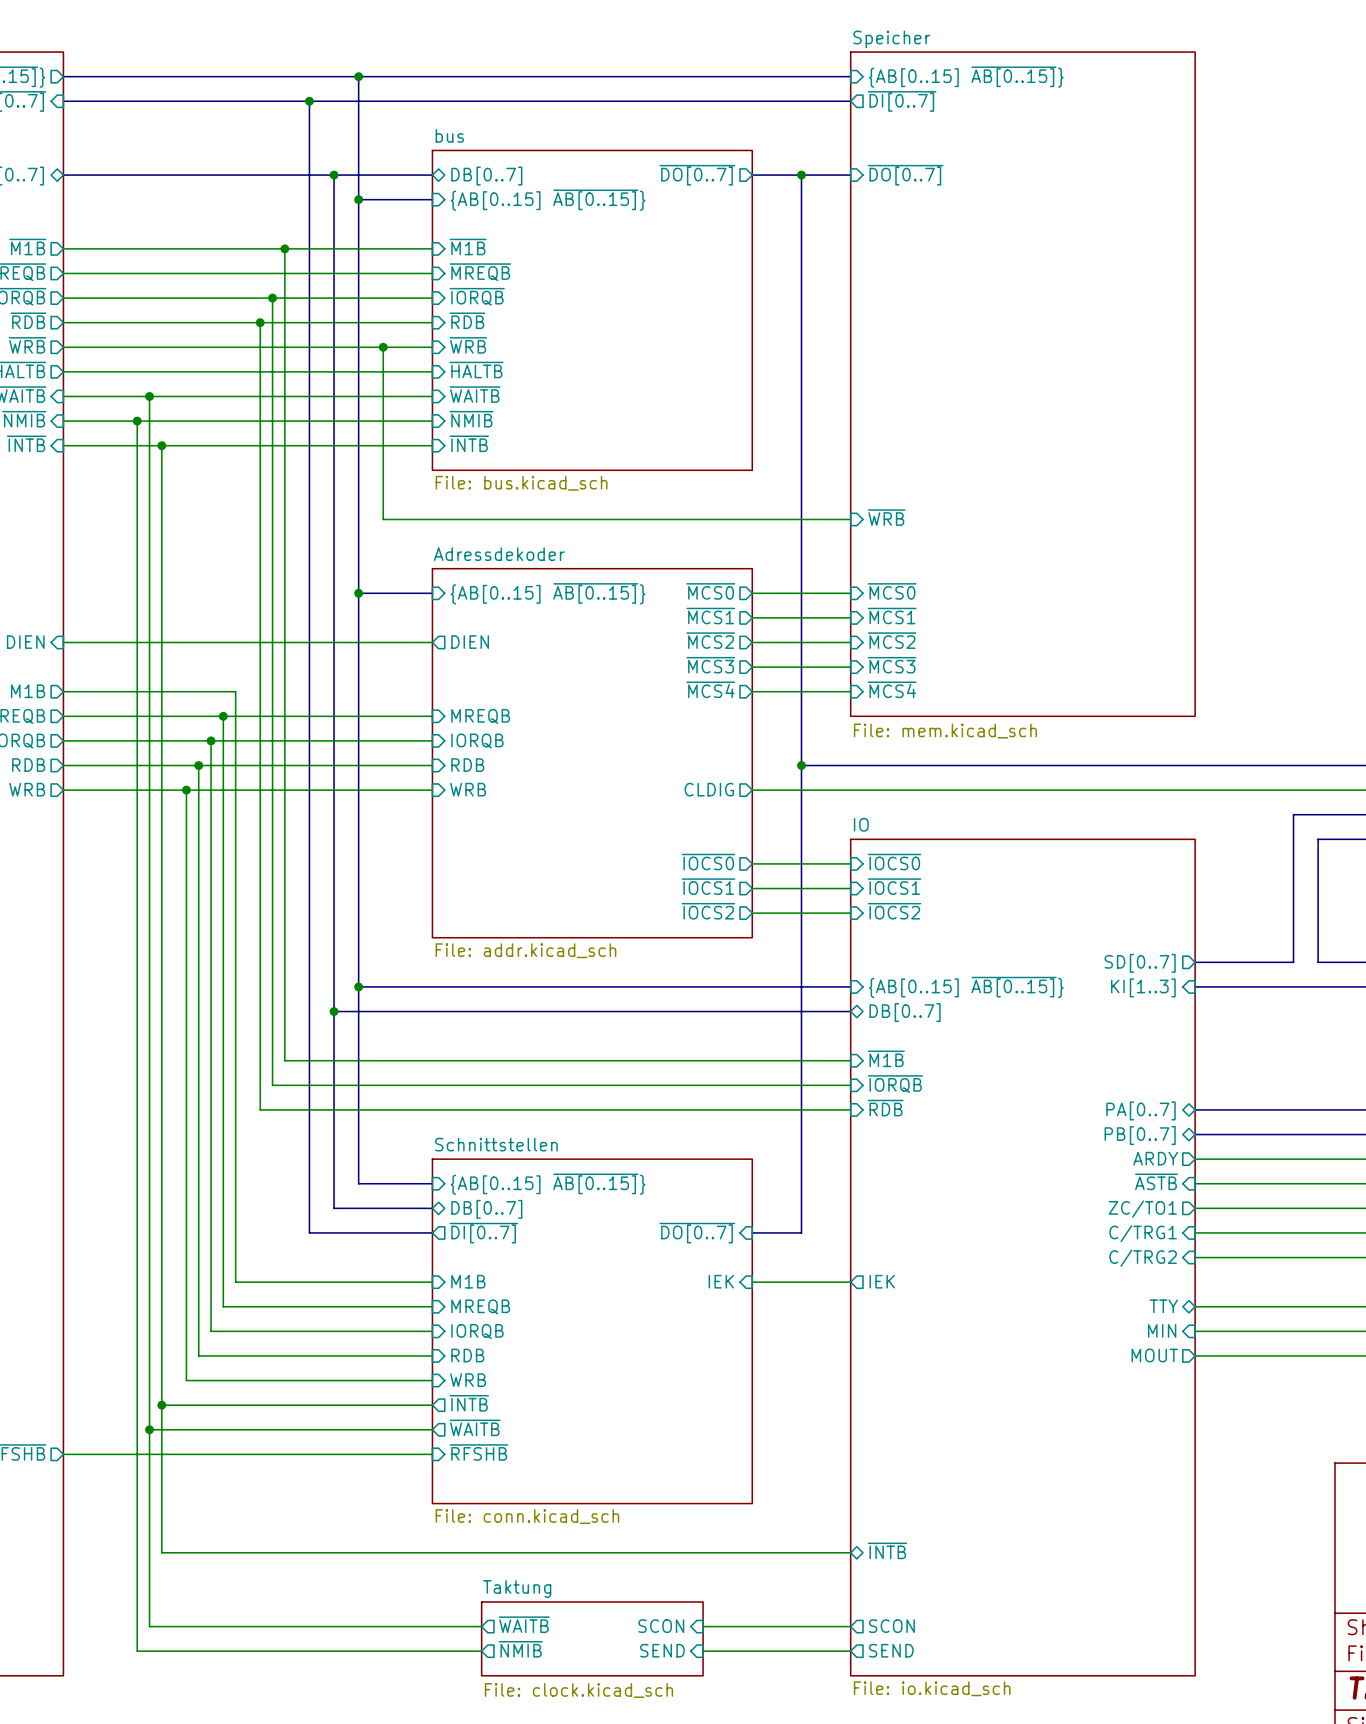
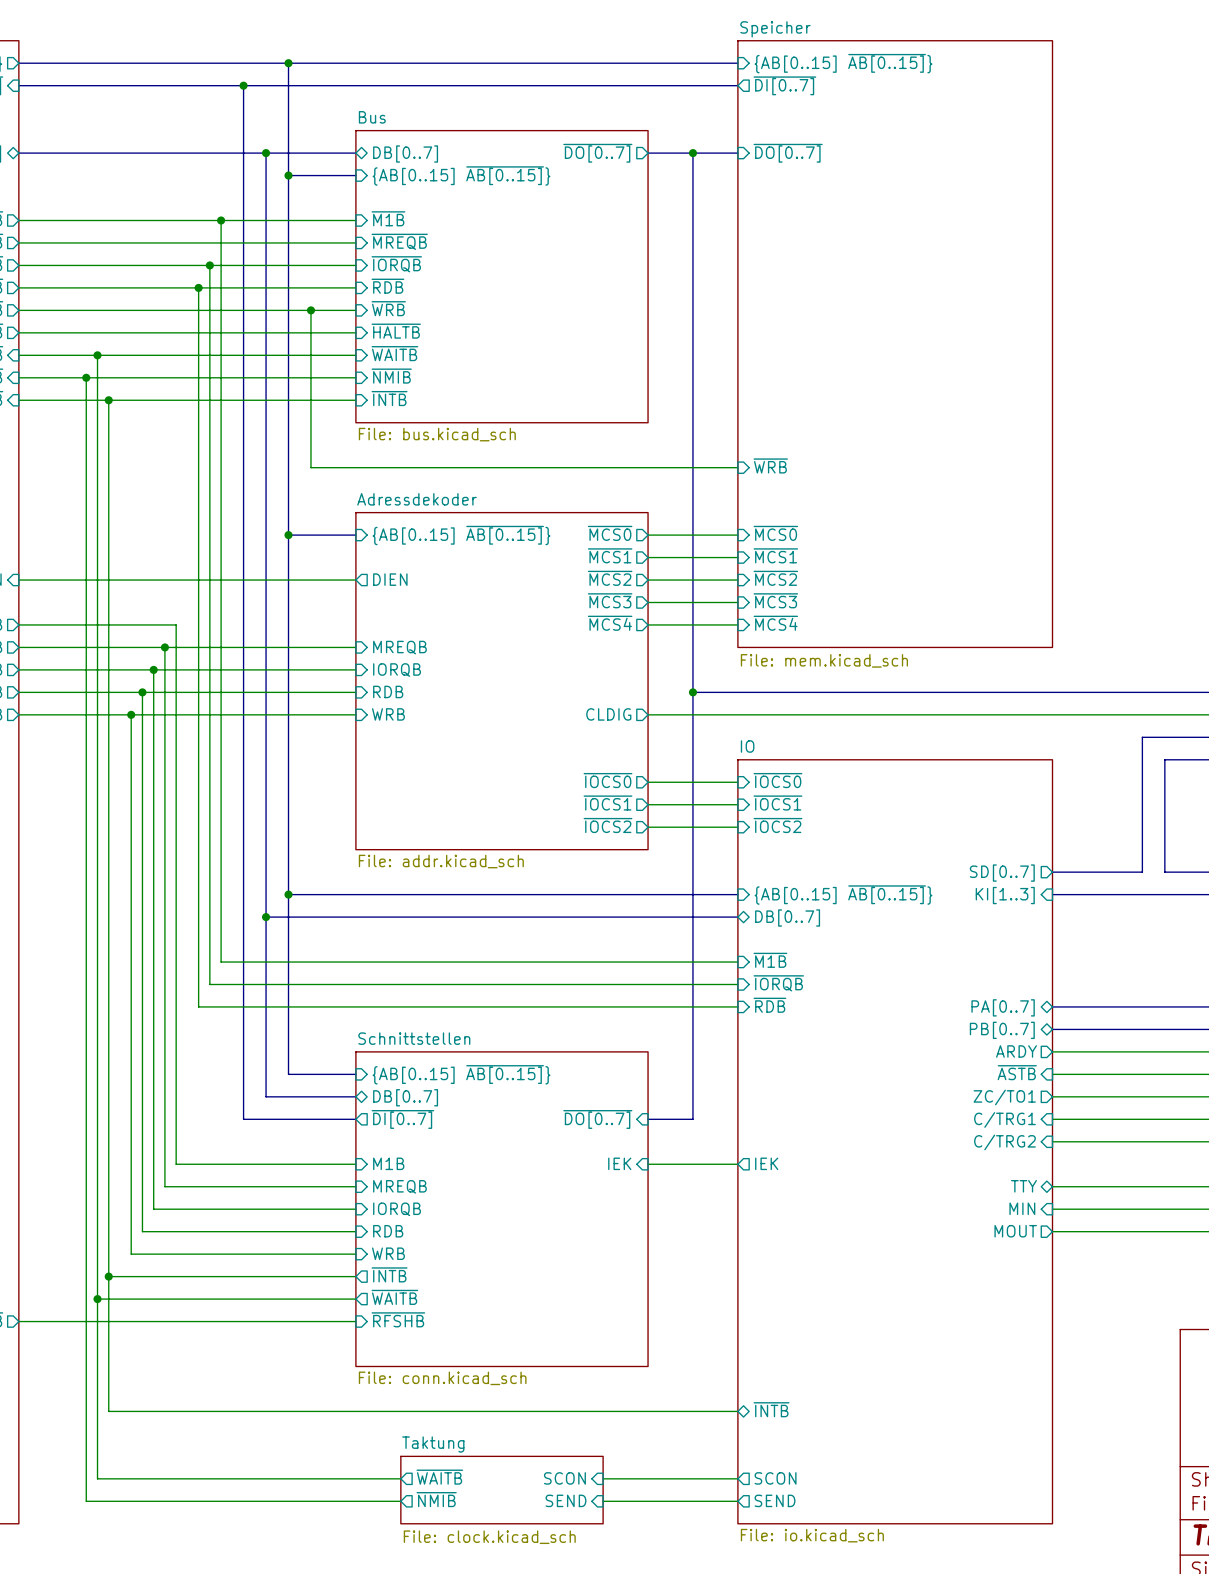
sheet bus name: bus (449, 135) -> Bus (372, 117)

